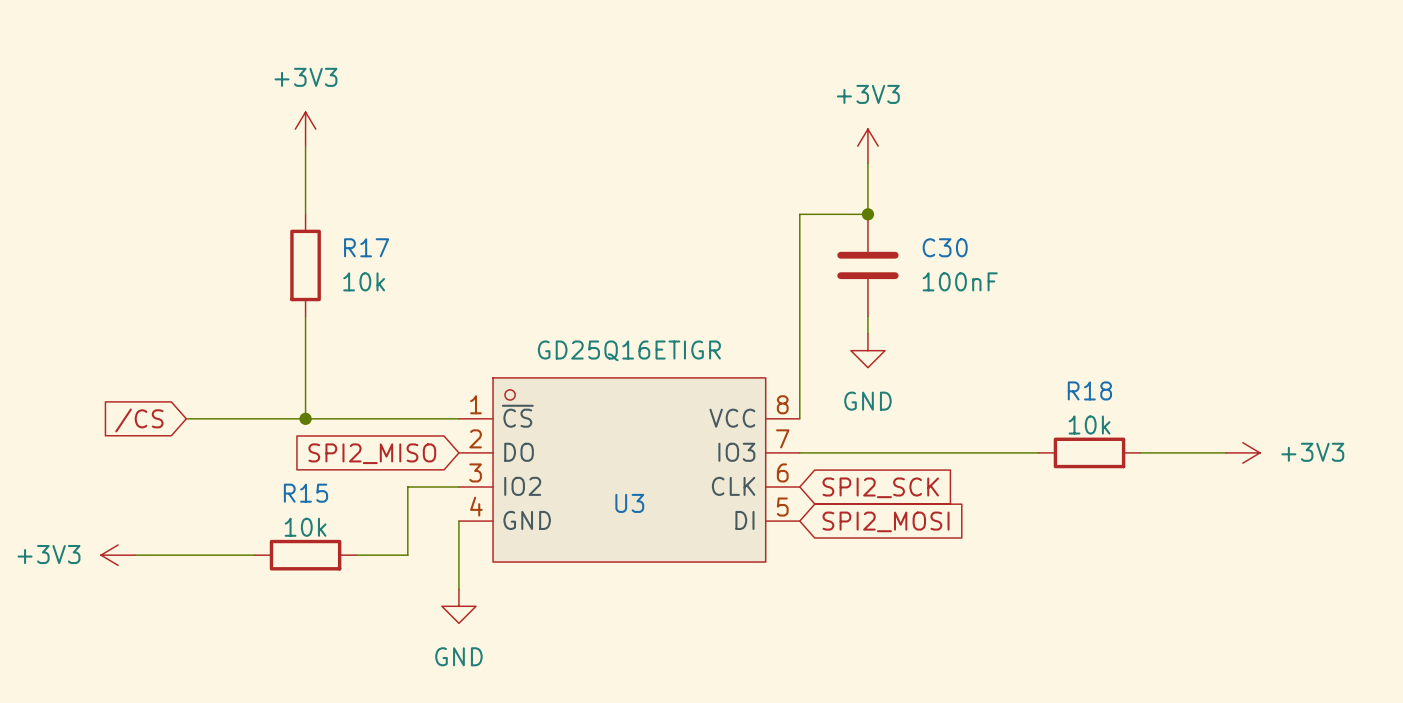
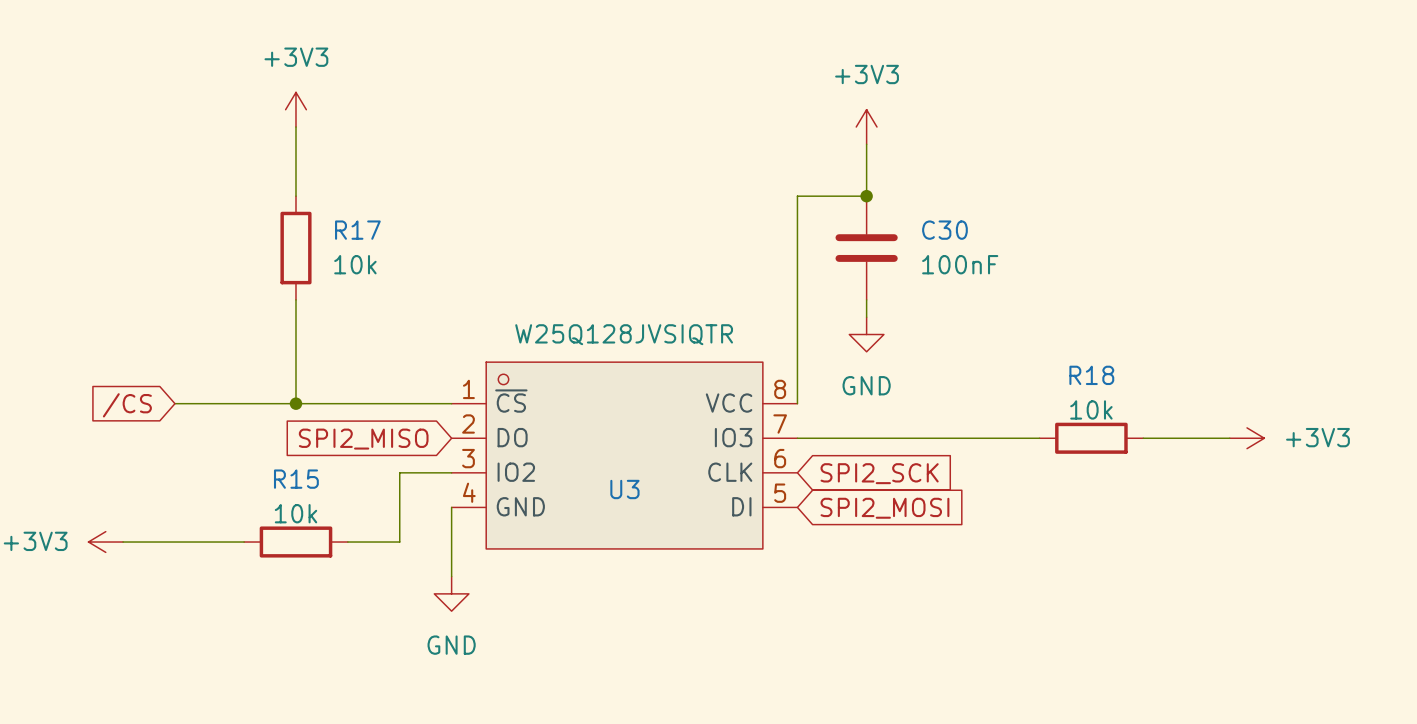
U3 value: GD25Q16ETIGR (629, 350) -> W25Q128JVSIQTR (624, 334)

